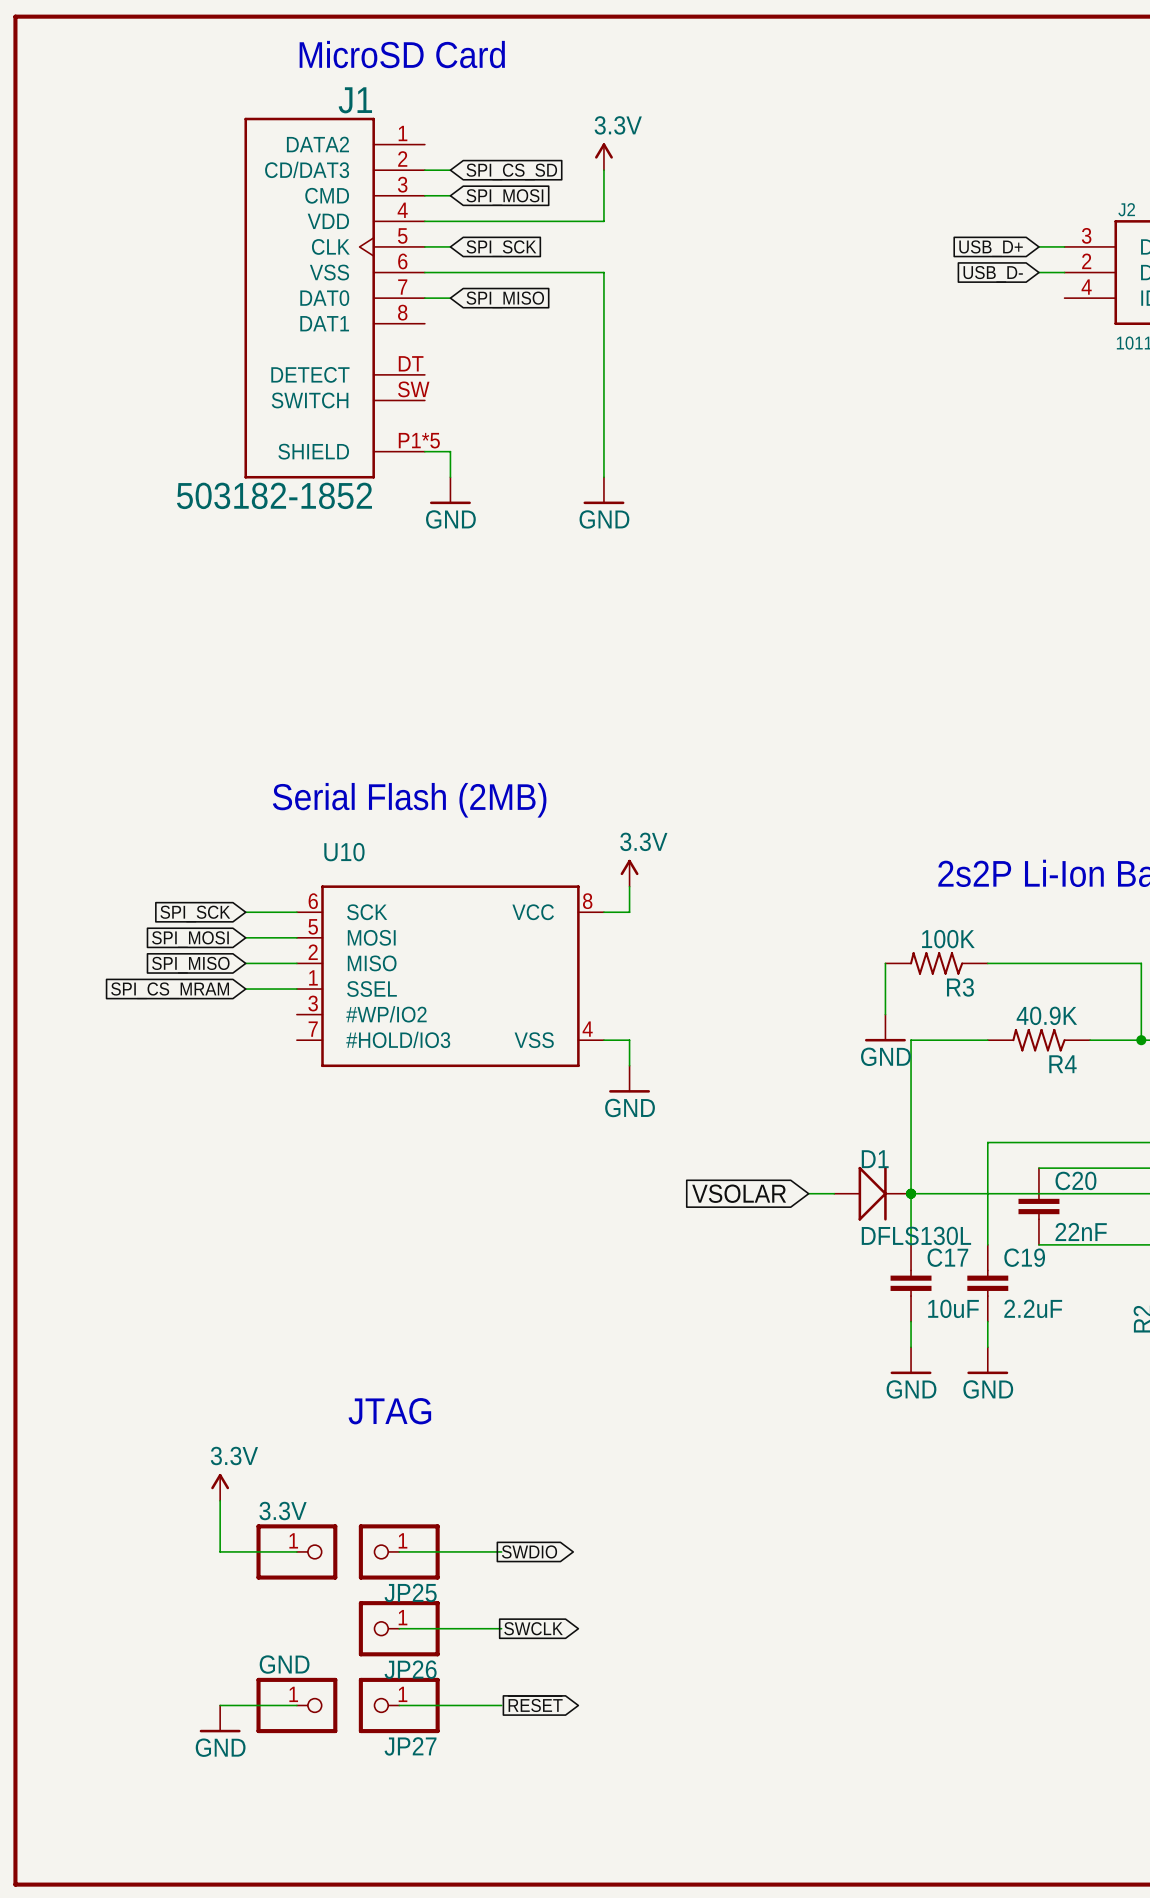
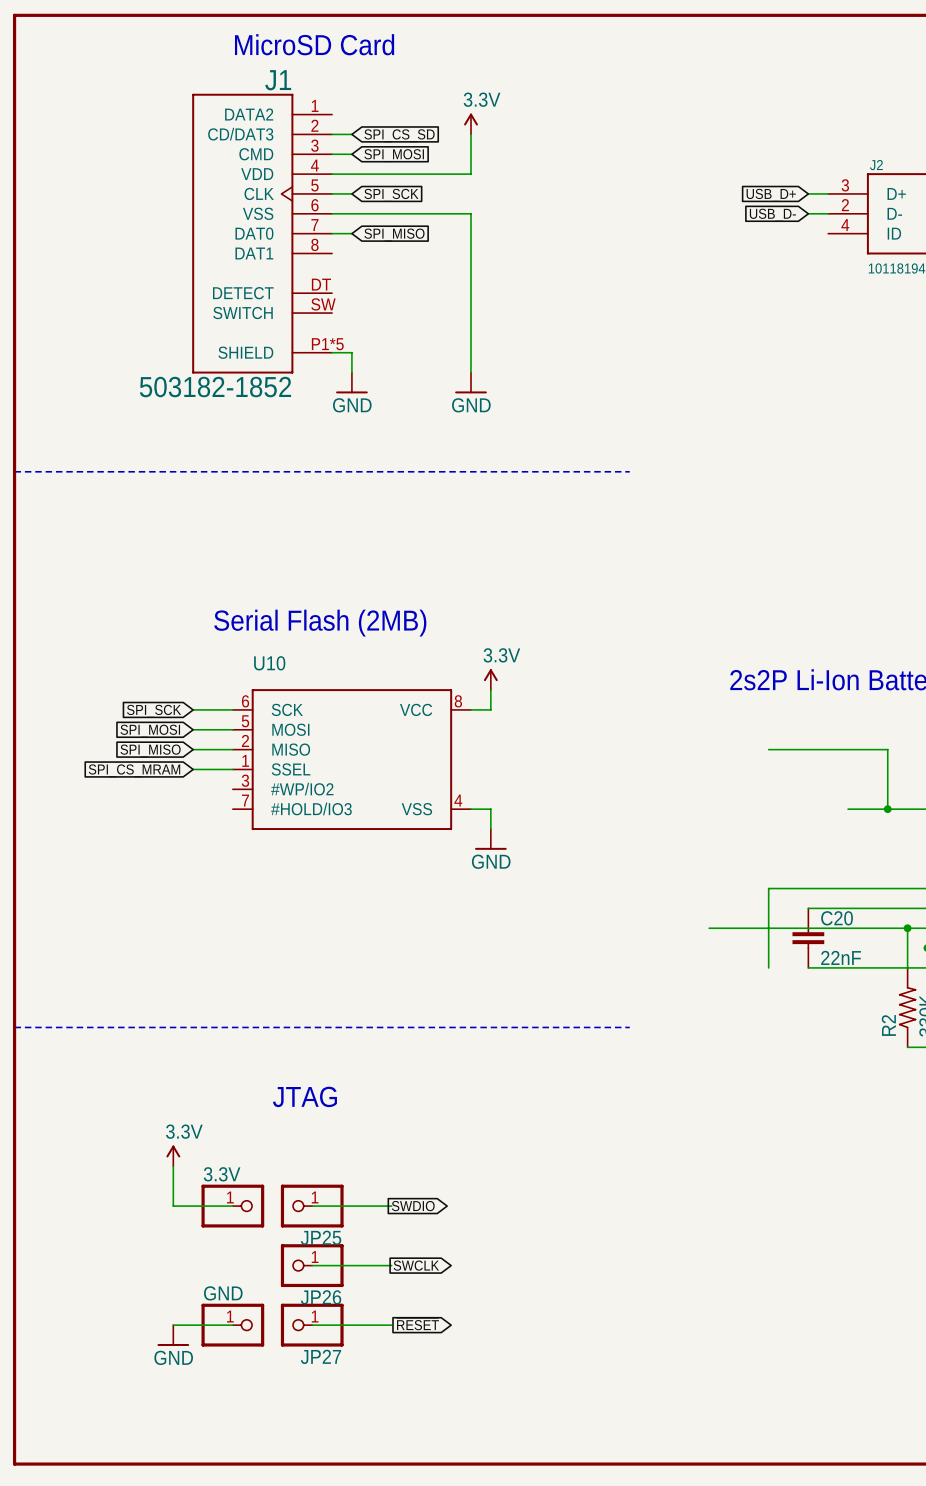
line: none -> (14, 471) (629, 471)
wire: (885, 963) (885, 1014) -> none
R3: 100K (936, 963) -> none
power symbol: GND (885, 1028) -> none
wire: (987, 1040) (911, 1040) (911, 1244) -> none
R4: 40.9K (1038, 1040) -> none
global label: VSOLAR (739, 1193) -> none
wire: (808, 1193) (834, 1193) -> none
D1: DFLS130L (872, 1193) -> none
junction: (911, 1193) -> none
C17: 10uF (911, 1283) -> none
C19: 2.2uF (987, 1283) -> none
line: none -> (14, 1027) (629, 1027)
wire: (911, 1321) (911, 1347) -> none
wire: (987, 1321) (987, 1347) -> none
power symbol: GND (911, 1360) -> none
power symbol: GND (987, 1360) -> none

